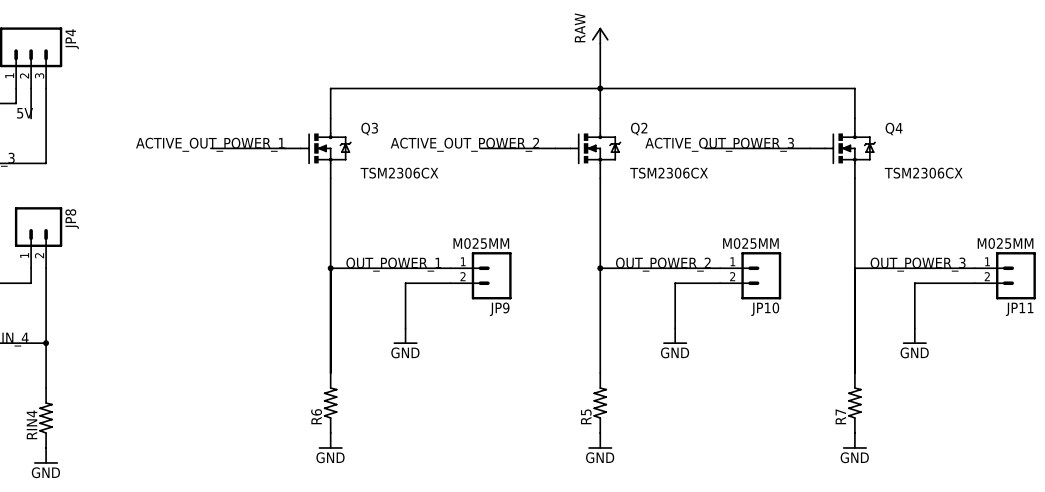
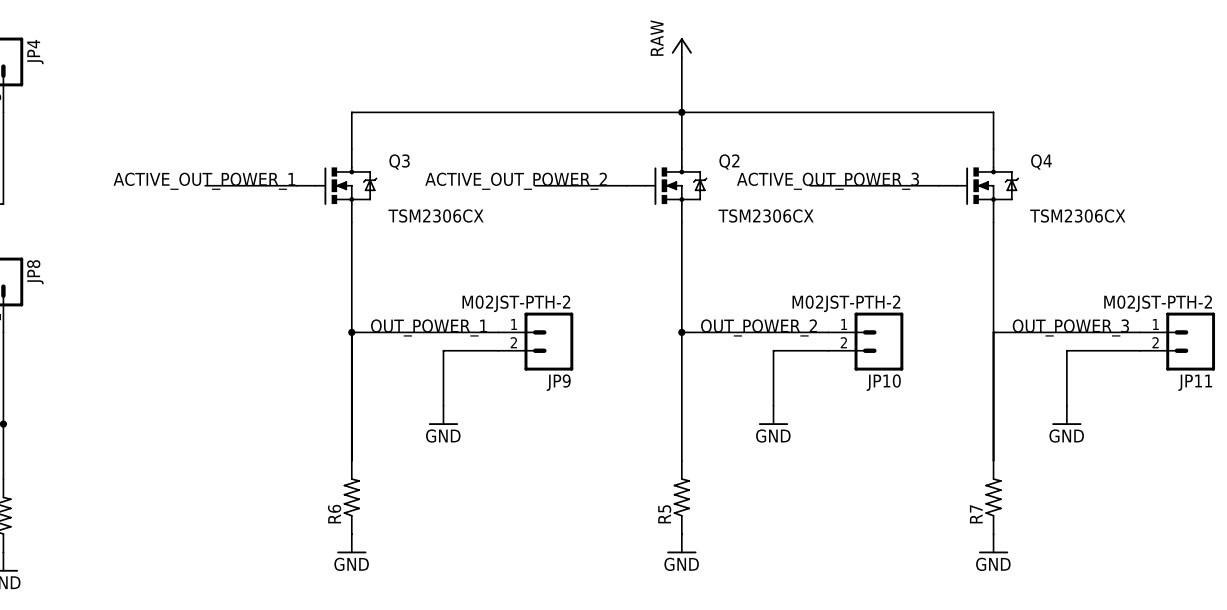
JP9 value: M025MM (481, 243) -> M02JST-PTH-2 (516, 303)
JP10 value: M025MM (750, 243) -> M02JST-PTH-2 (846, 303)
JP11 value: M025MM (1005, 243) -> M02JST-PTH-2 (1158, 303)

